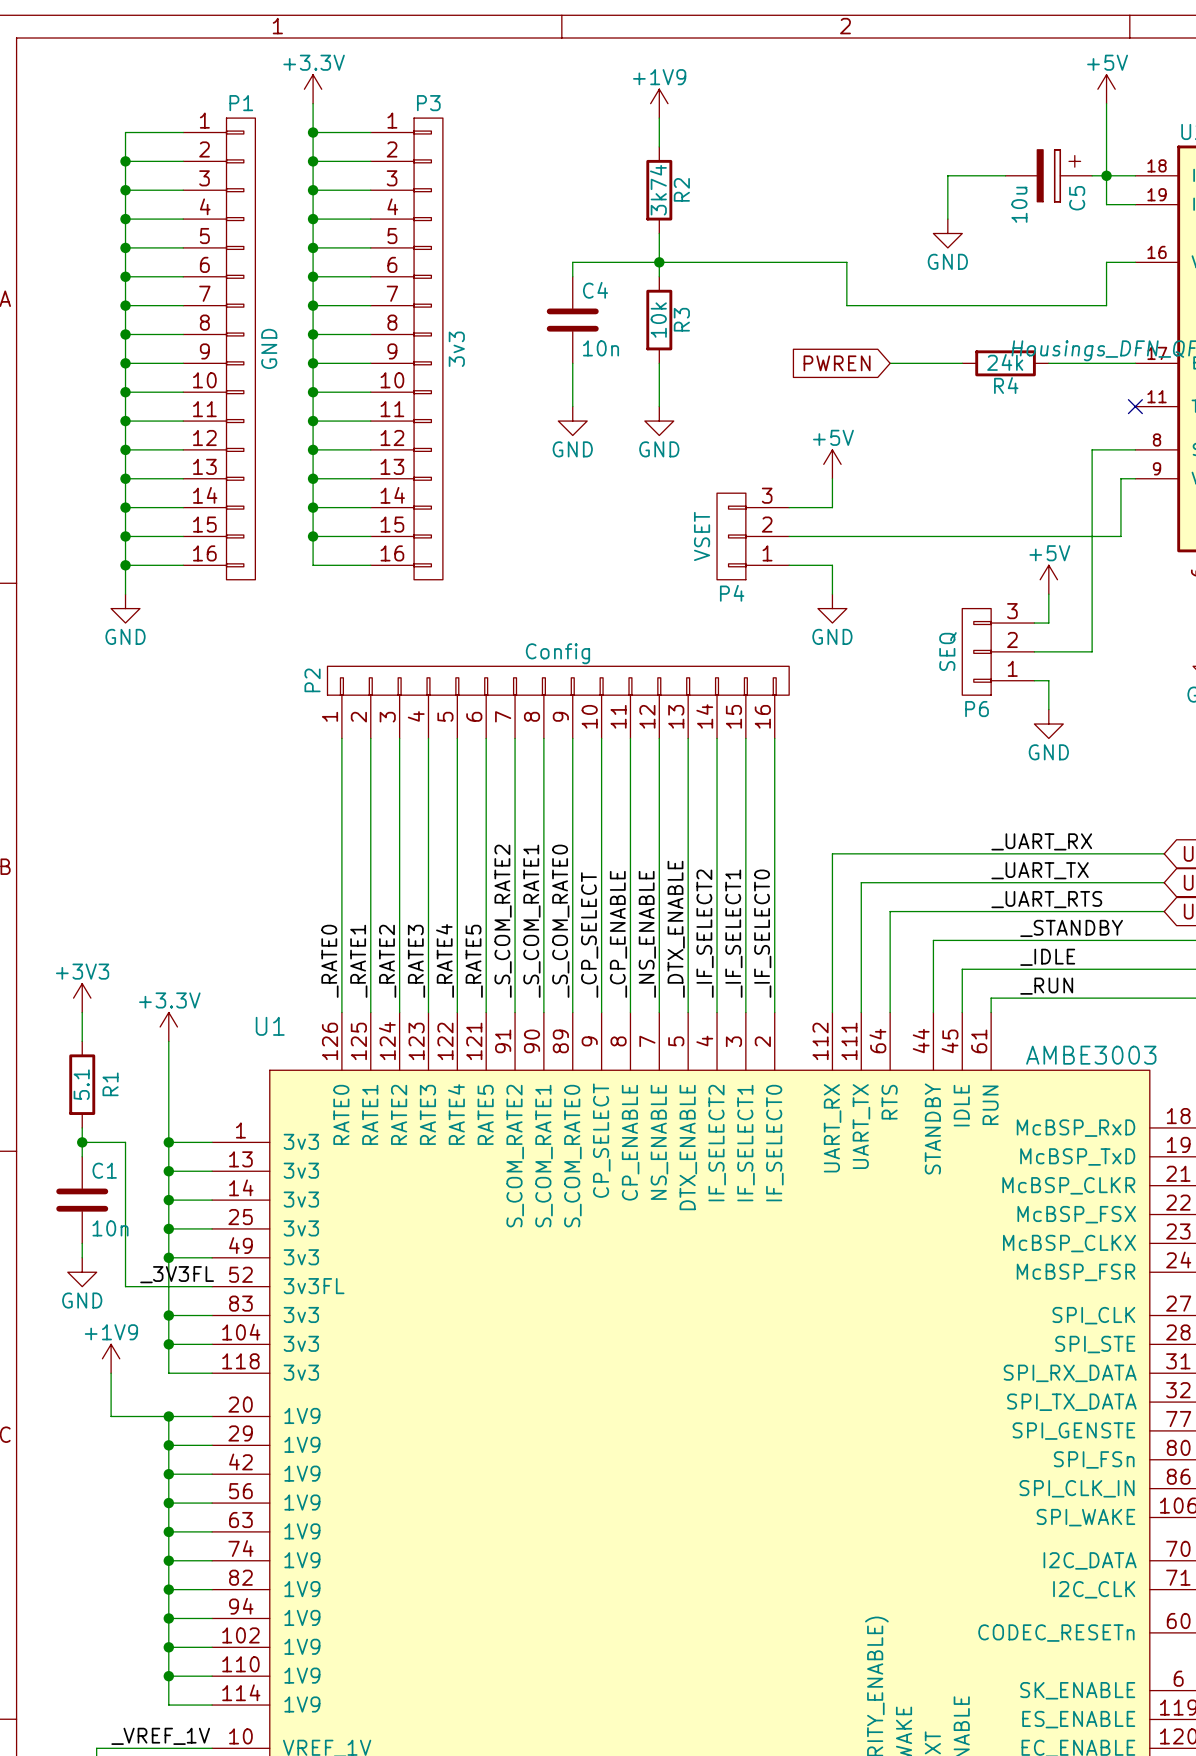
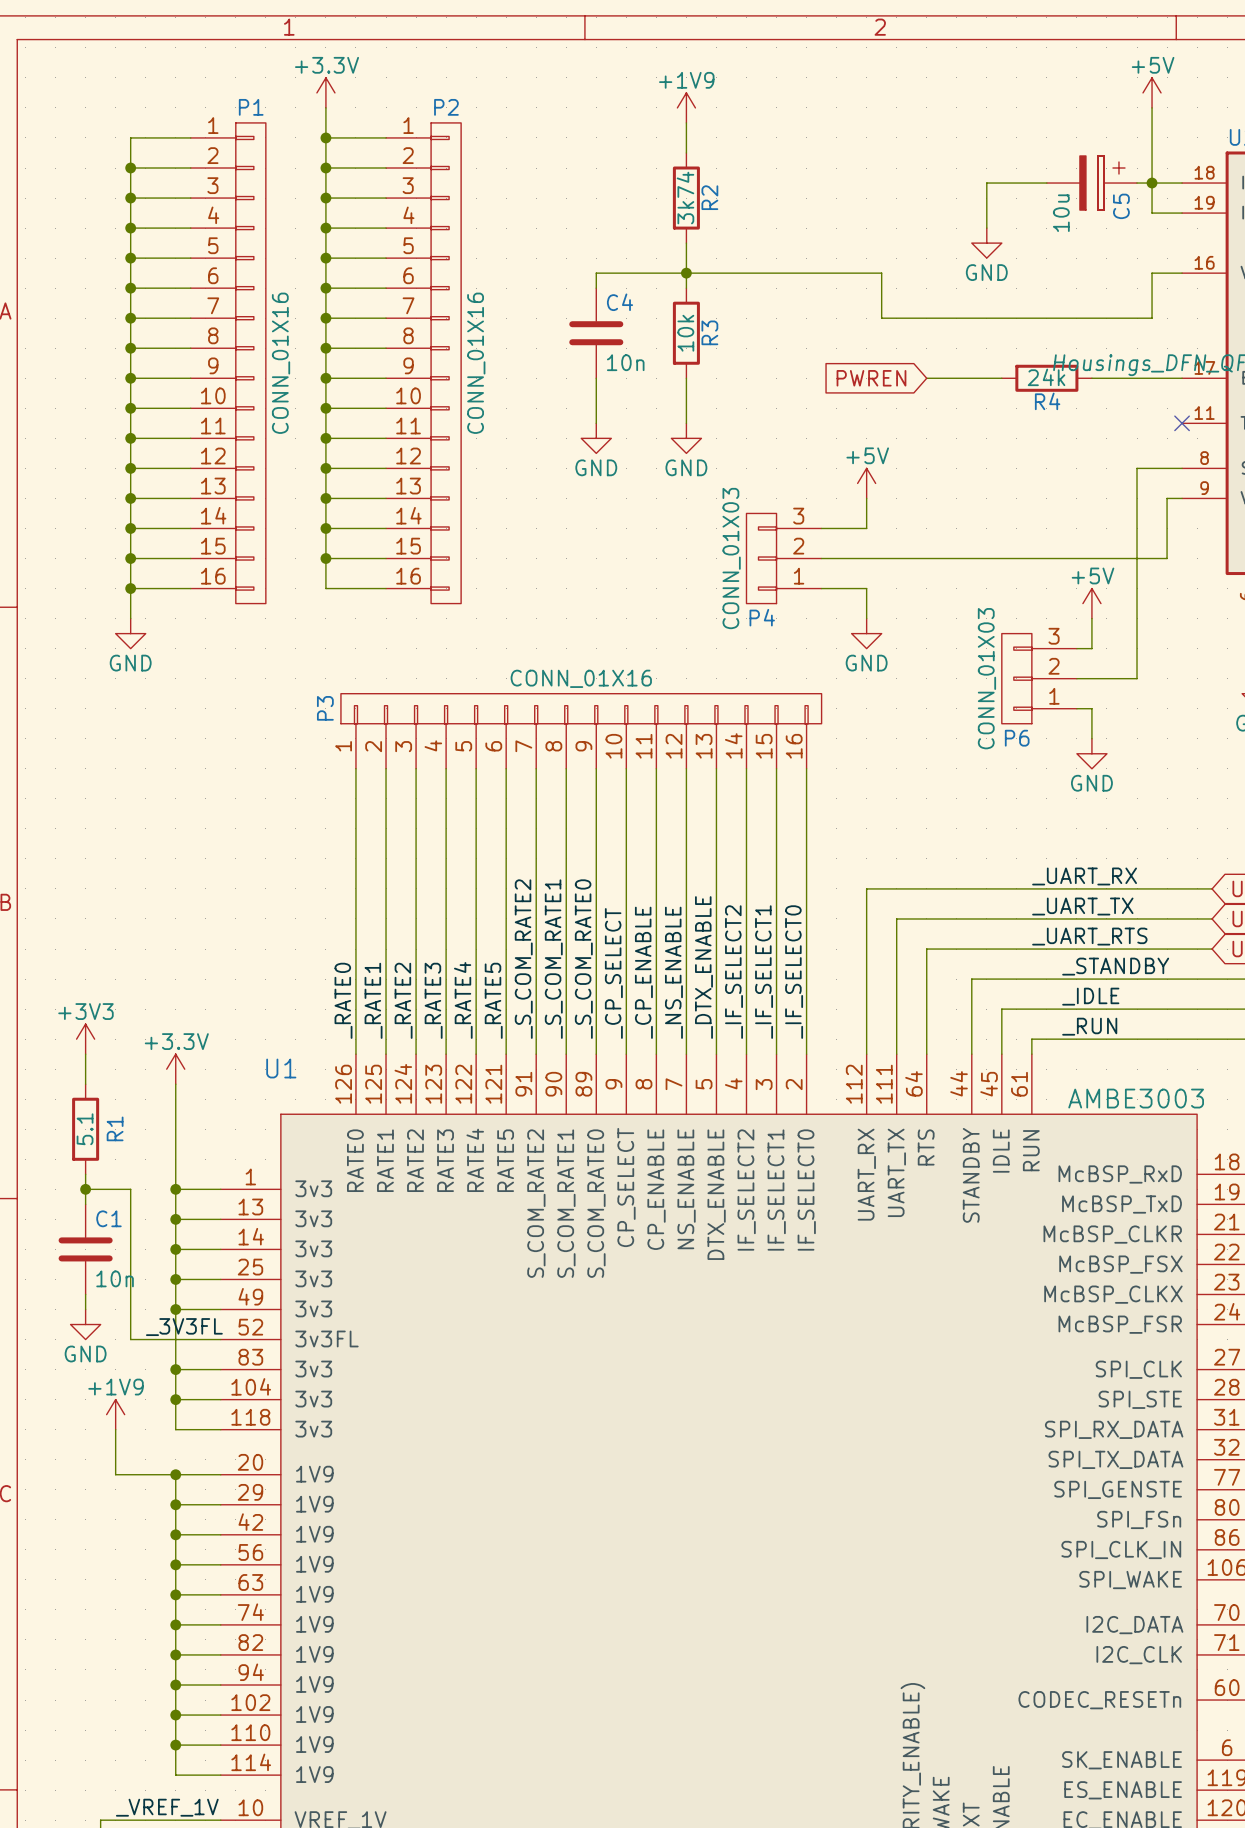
P3 name: P3 (428, 103) -> P2 (446, 107)
P1 value: GND (269, 348) -> CONN_01X16 (281, 363)
P3 value: 3v3 (456, 349) -> CONN_01X16 (476, 363)
P4 value: VSET (702, 536) -> CONN_01X03 (731, 558)
P6 value: SEQ (947, 651) -> CONN_01X03 (986, 678)
P2 value: Config (557, 653) -> CONN_01X16 (581, 678)
P2 name: P2 (312, 680) -> P3 (325, 708)

